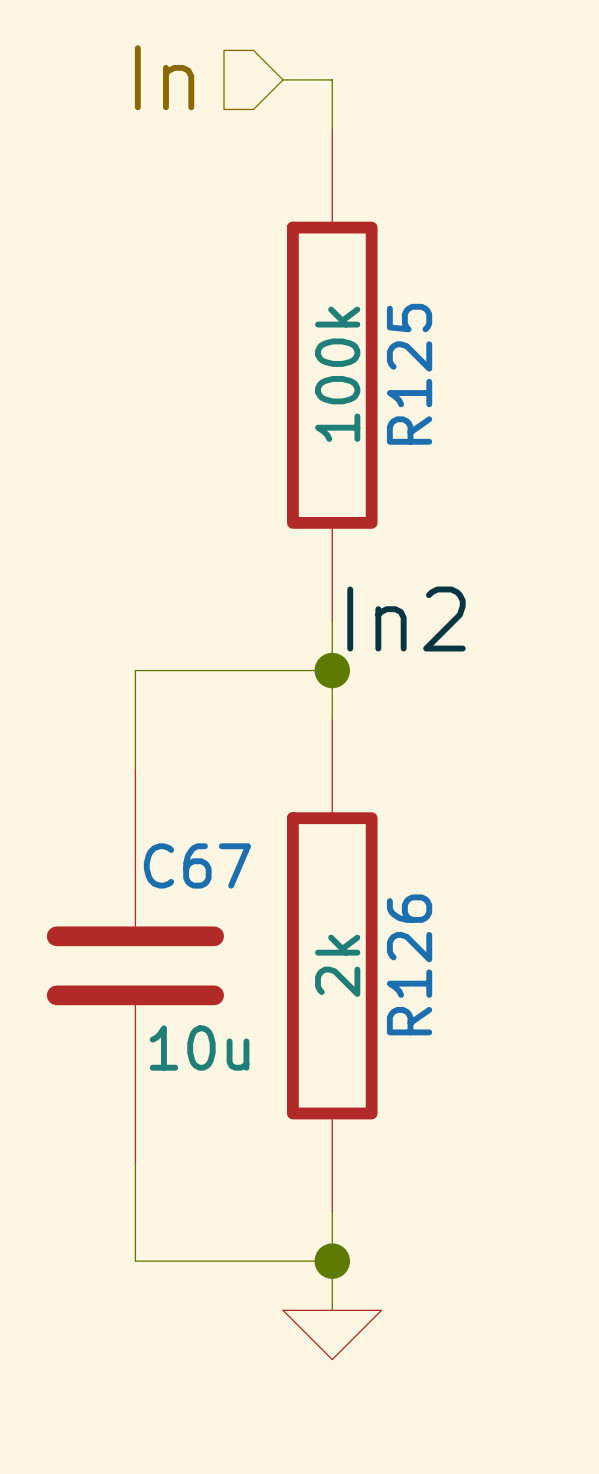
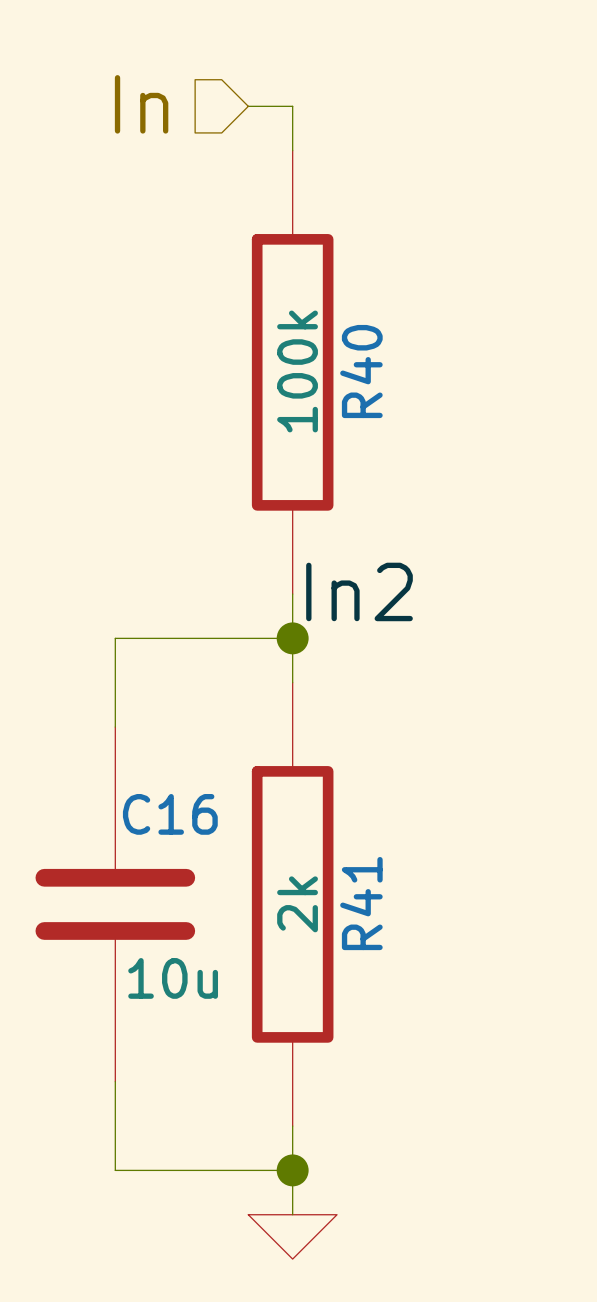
R125 name: R125 (409, 374) -> R40 (361, 371)
C67 name: C67 (197, 865) -> C16 (170, 814)
R126 name: R126 (409, 964) -> R41 (361, 903)

